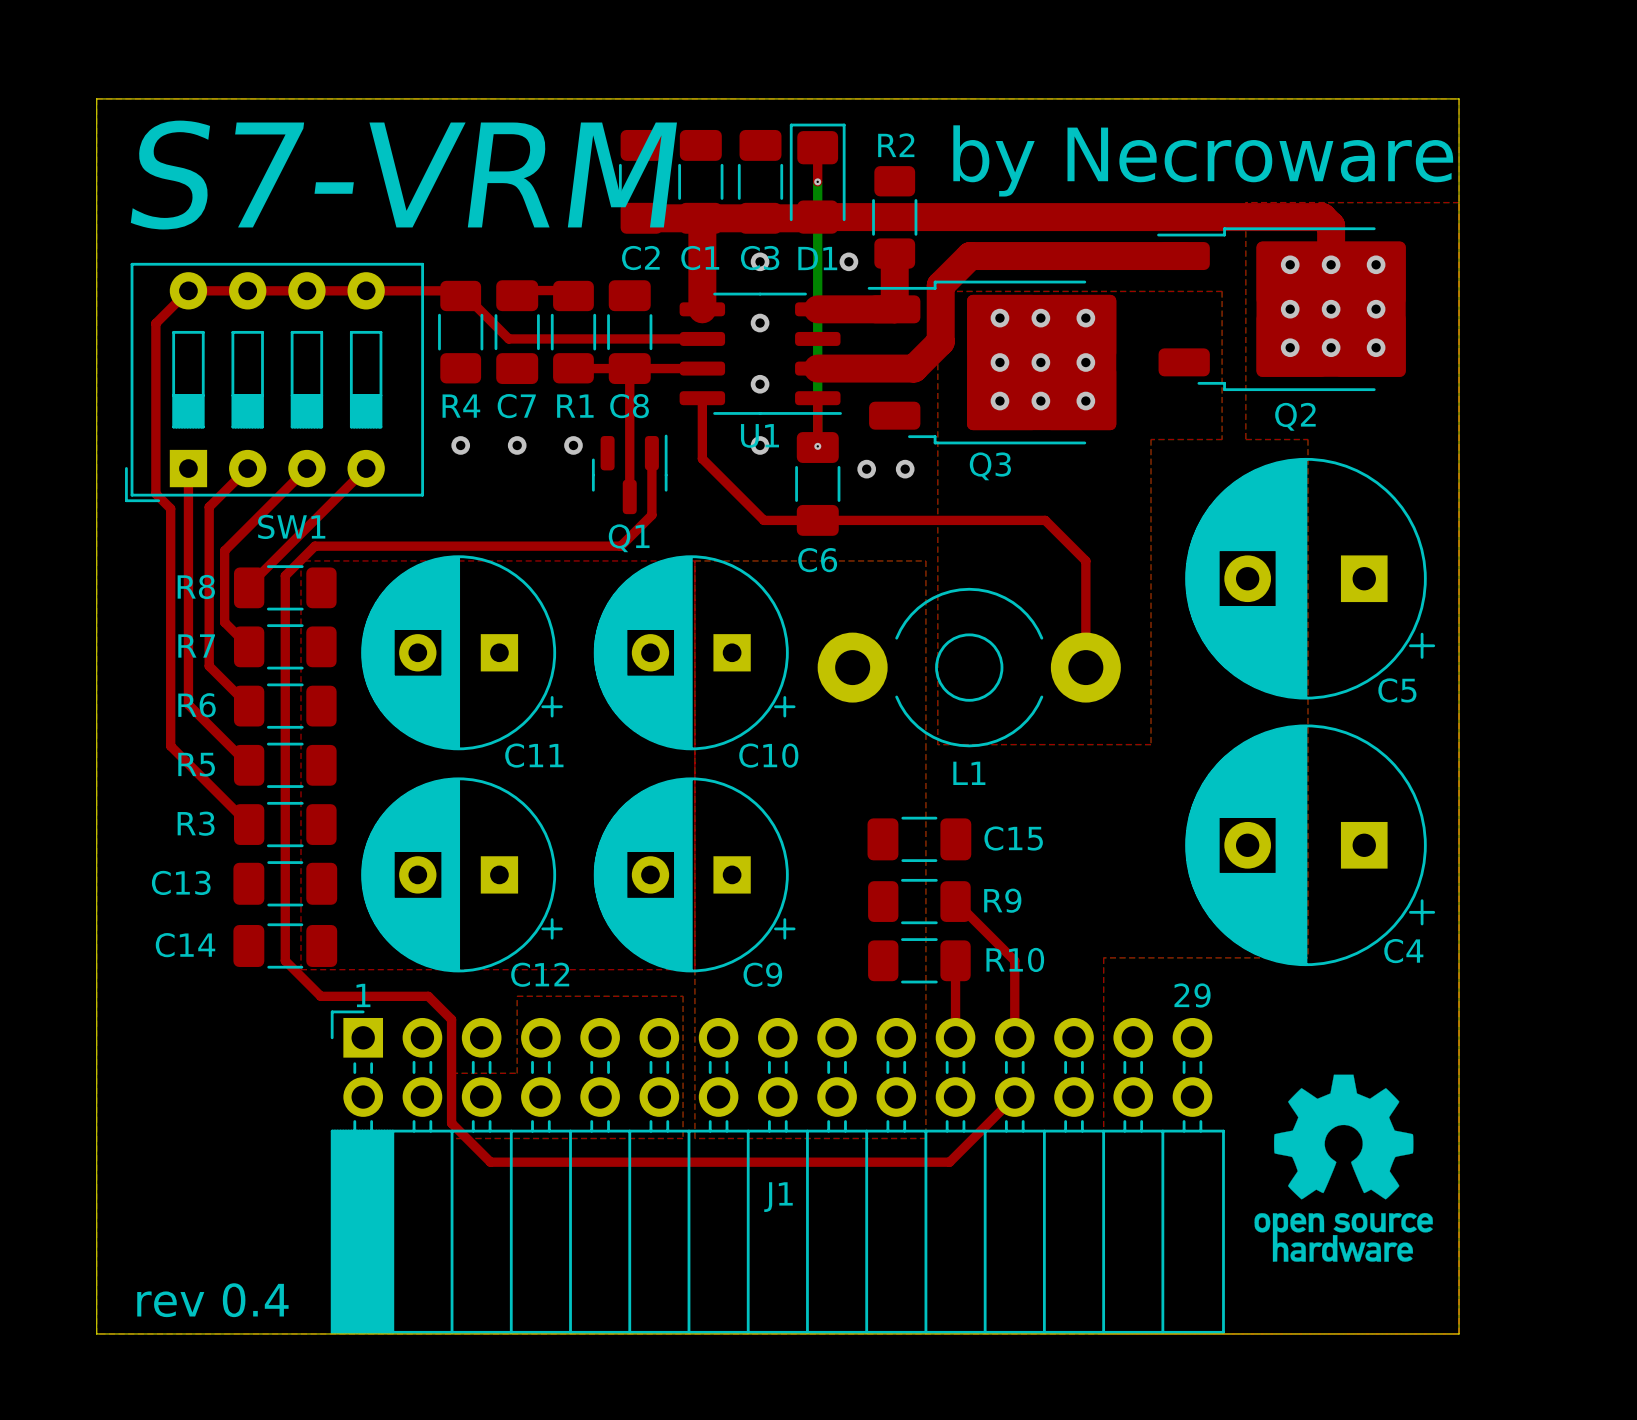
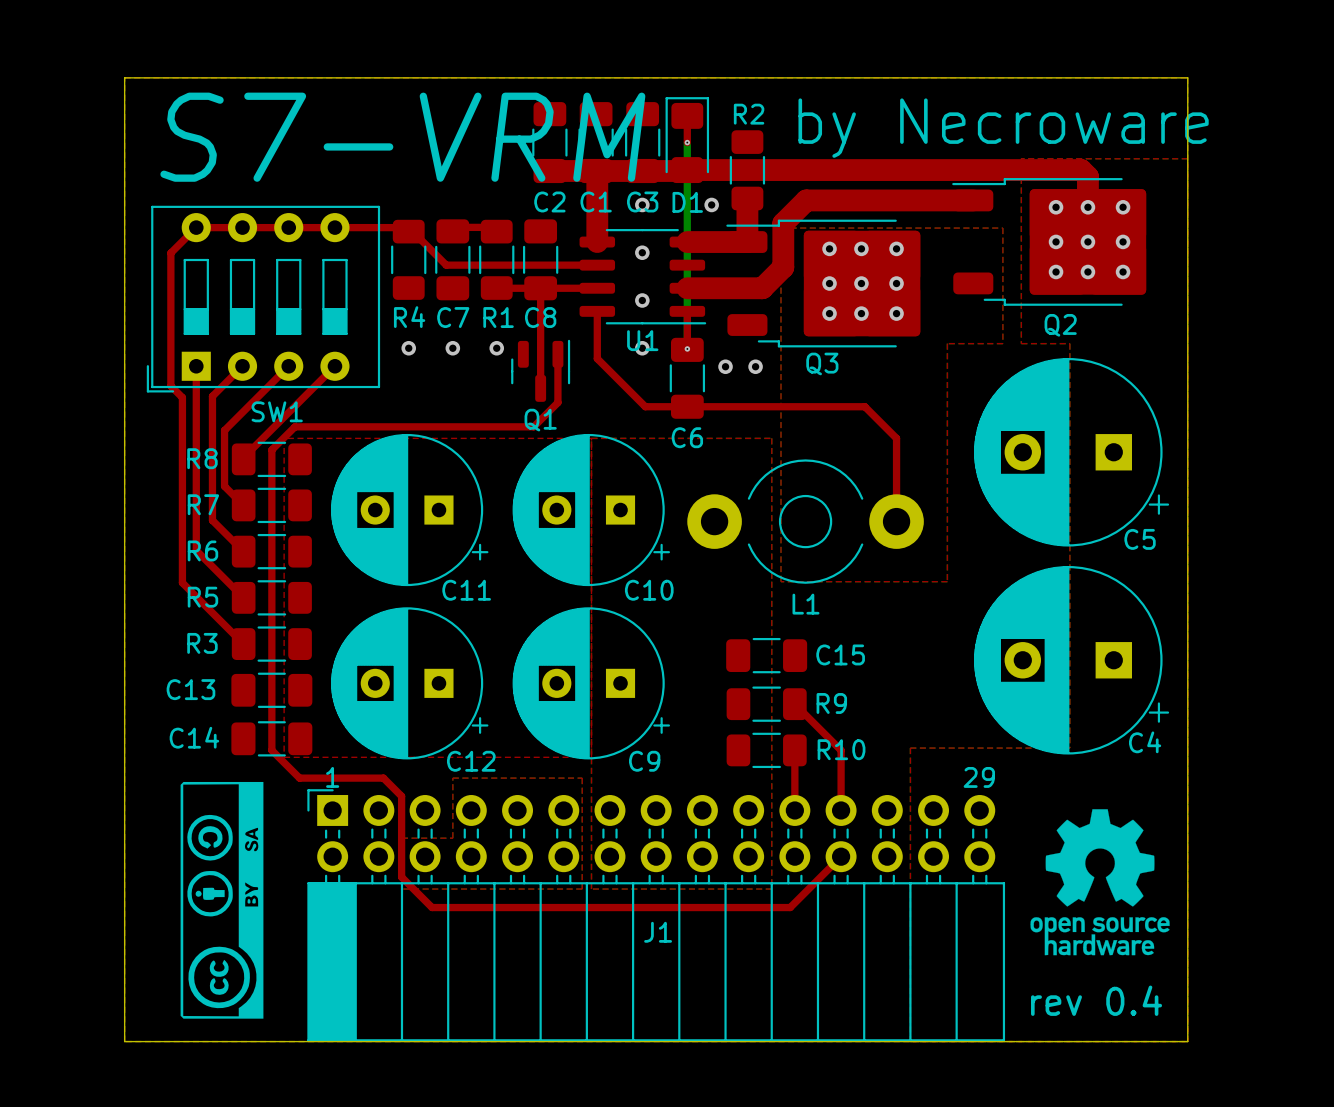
drawing: none -> [180, 781, 264, 1019]
drawing position: (1343, 1168) -> (1100, 882)
text: none -> rev 0.4 (1096, 1000)
text: rev 0.4 (212, 1300) -> none

